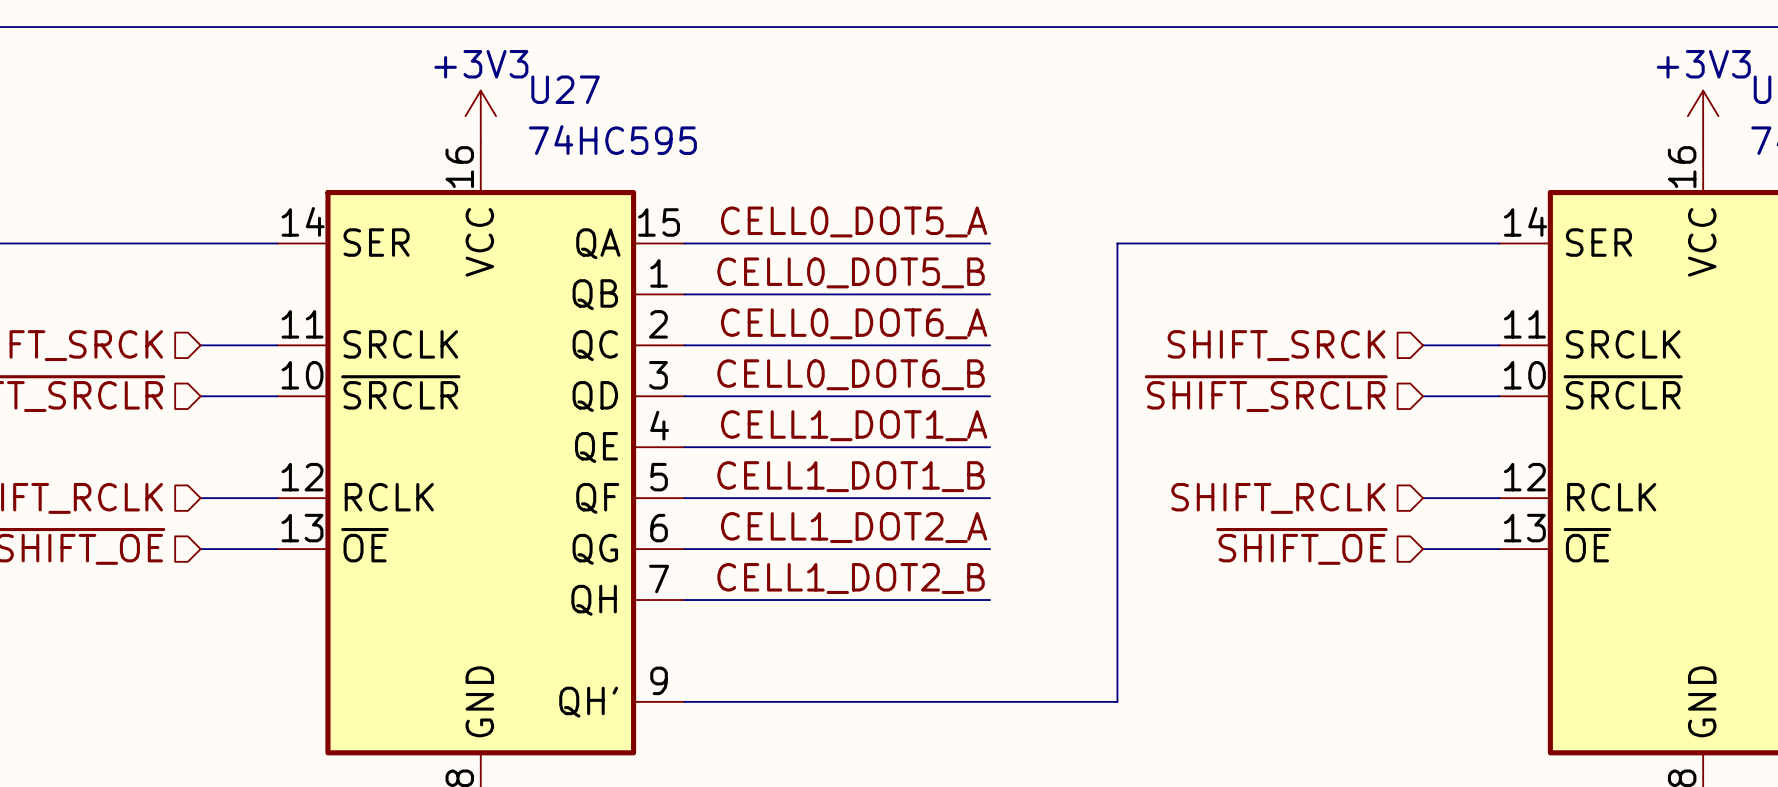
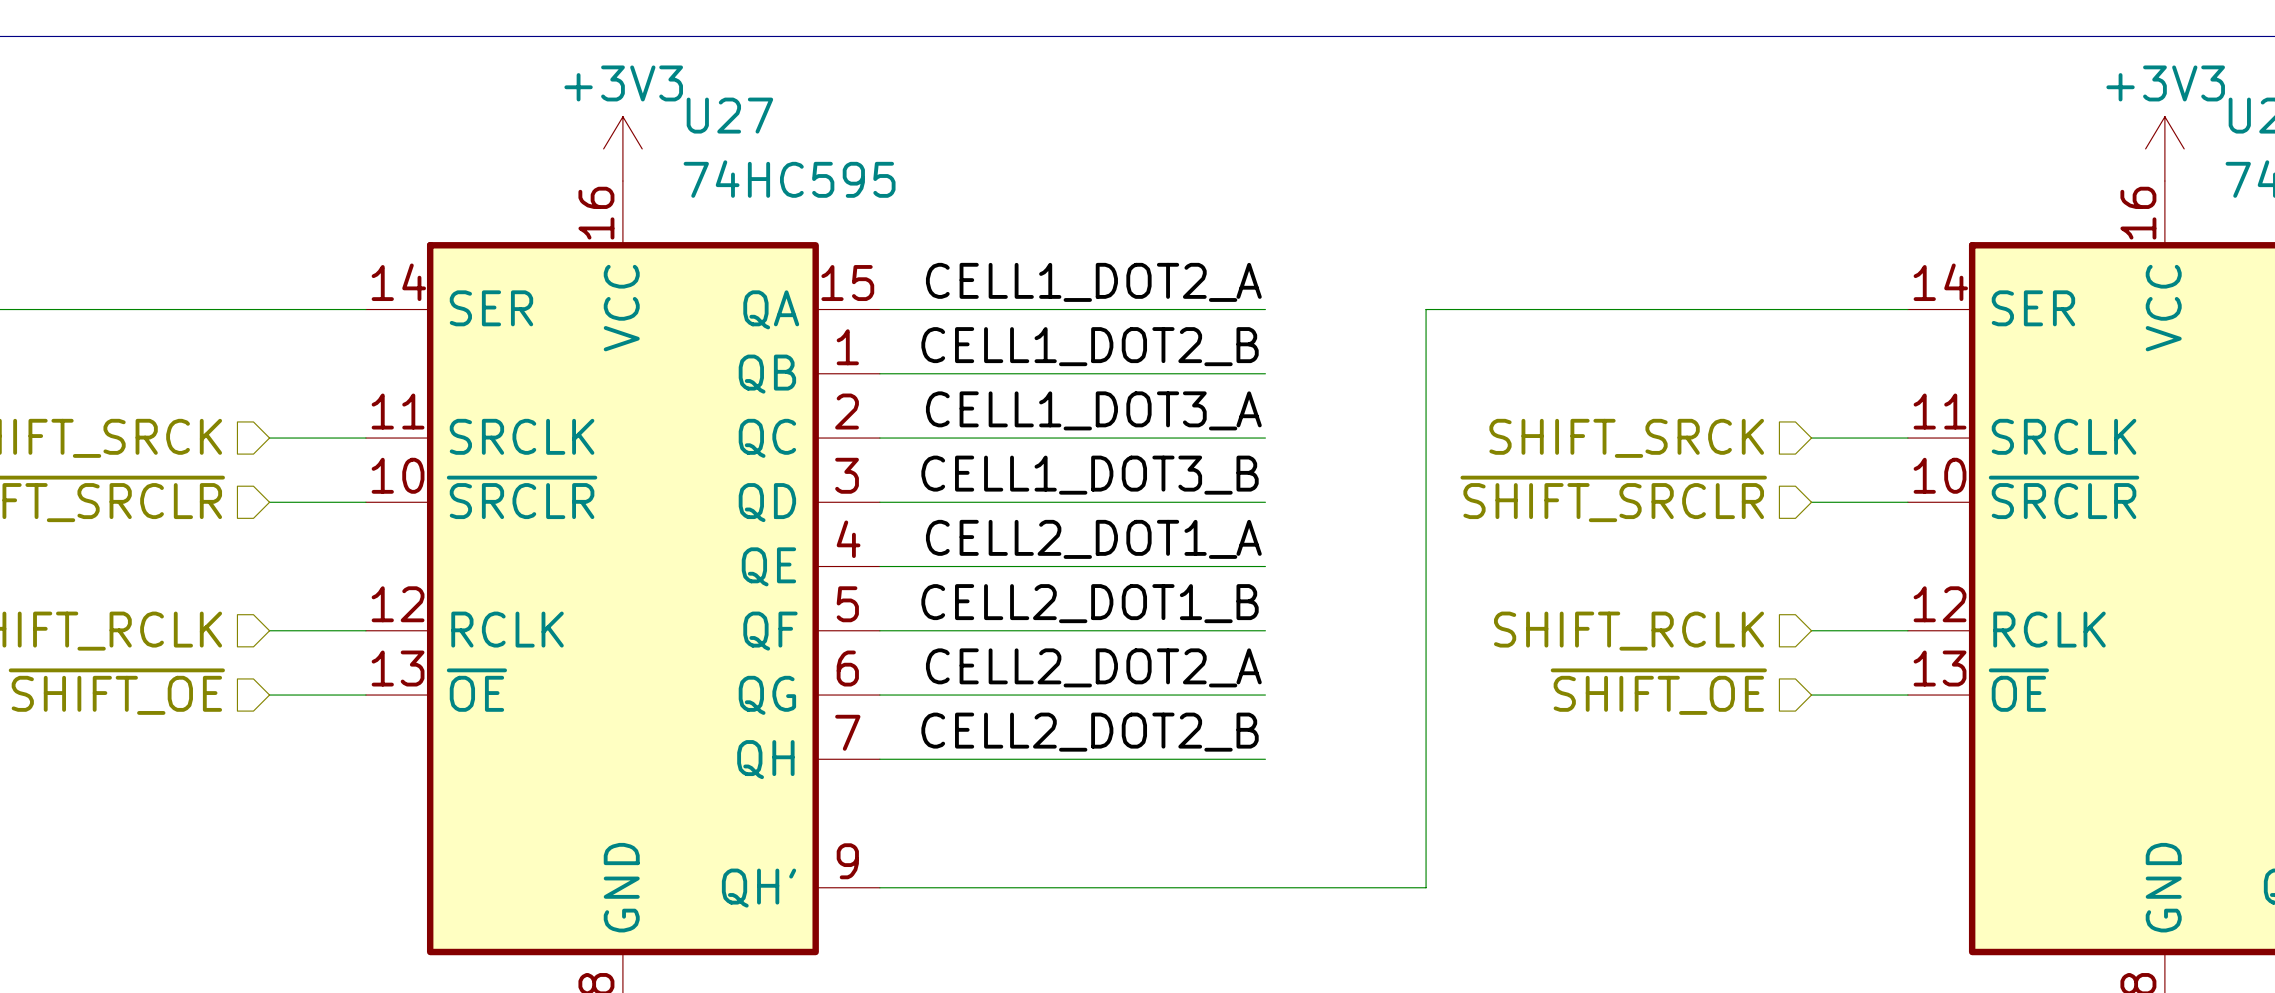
label: CELL0_DOT5_A (854, 221) -> CELL1_DOT2_A (1093, 282)
label: CELL0_DOT5_B (851, 272) -> CELL1_DOT2_B (1090, 346)
label: CELL0_DOT6_A (854, 323) -> CELL1_DOT3_A (1093, 410)
label: CELL0_DOT6_B (851, 374) -> CELL1_DOT3_B (1090, 475)
label: CELL1_DOT1_A (854, 425) -> CELL2_DOT1_A (1093, 539)
label: CELL1_DOT1_B (851, 476) -> CELL2_DOT1_B (1090, 603)
label: CELL1_DOT2_A (854, 527) -> CELL2_DOT2_A (1093, 667)
label: CELL1_DOT2_B (851, 578) -> CELL2_DOT2_B (1090, 732)

